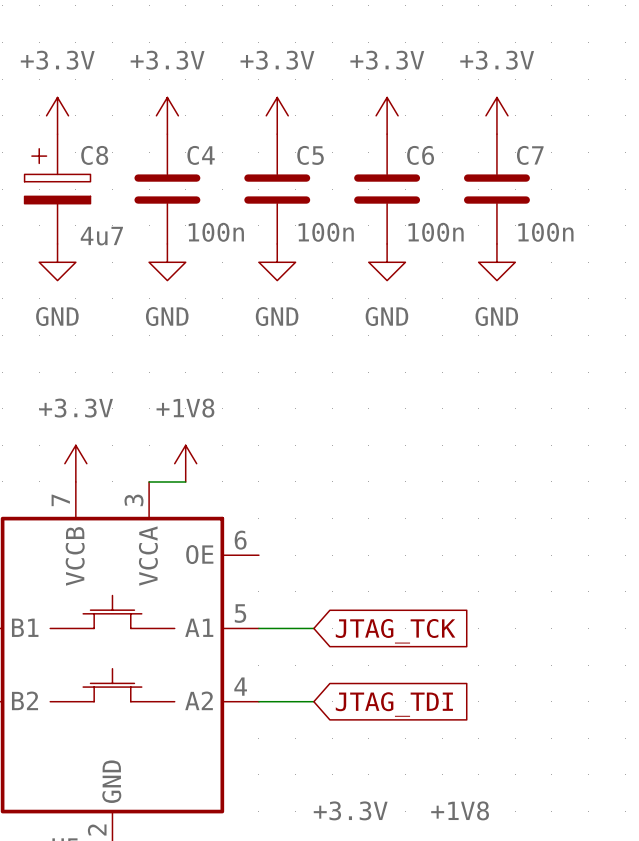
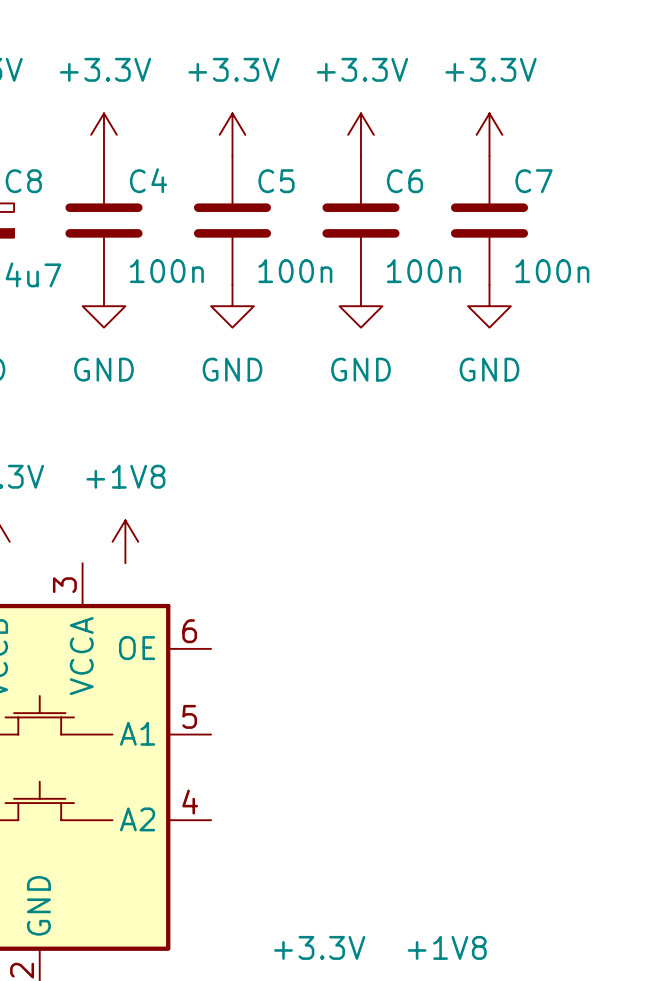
wire: (149, 481) (185, 481) -> none
wire: (258, 628) (313, 628) -> none
global label: JTAG_TCK (395, 631) -> none
wire: (258, 701) (313, 701) -> none
global label: JTAG_TDI (394, 704) -> none

